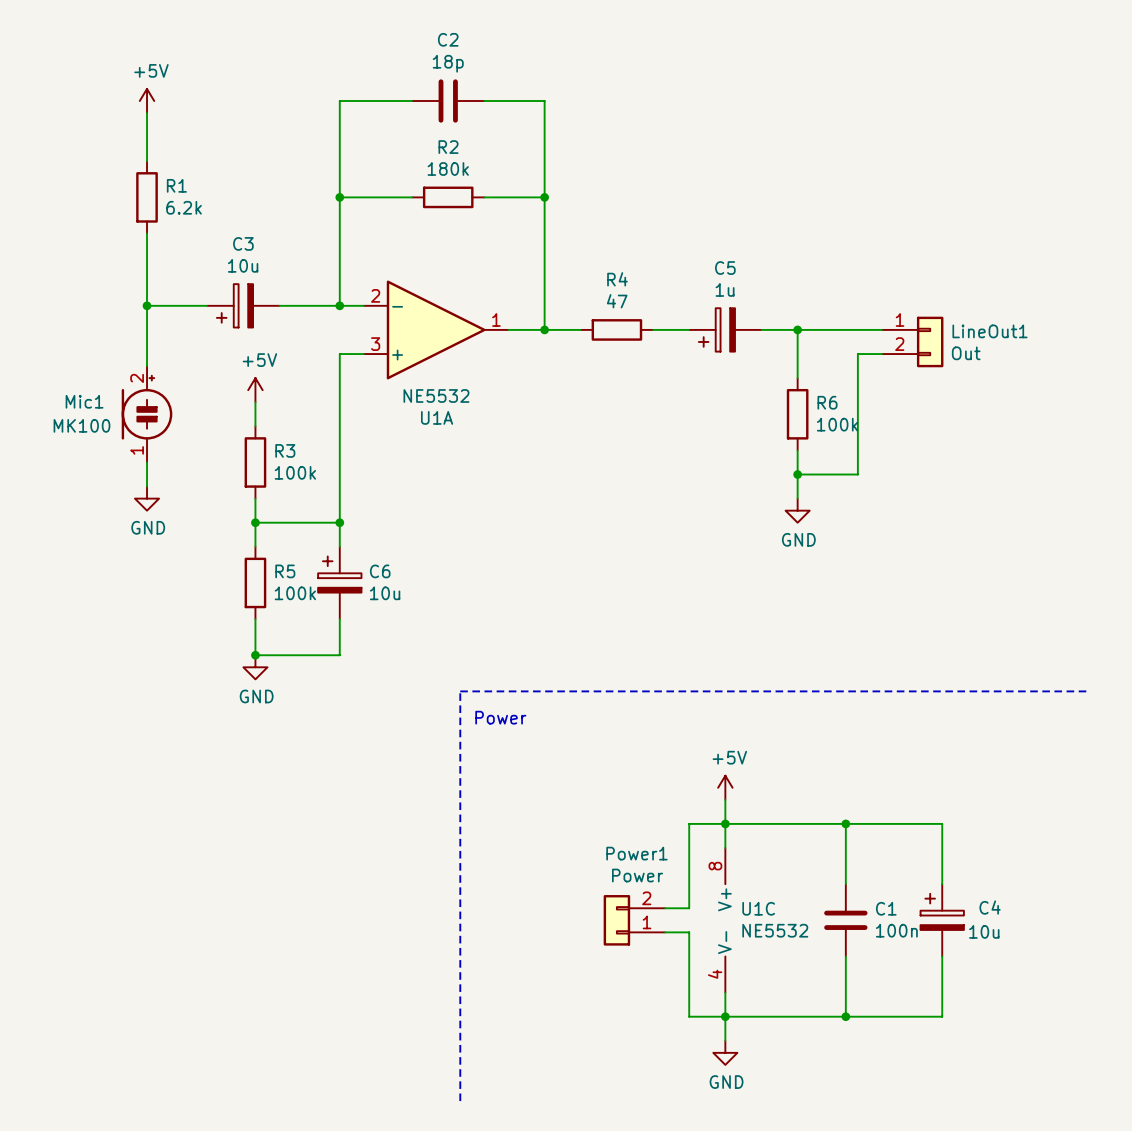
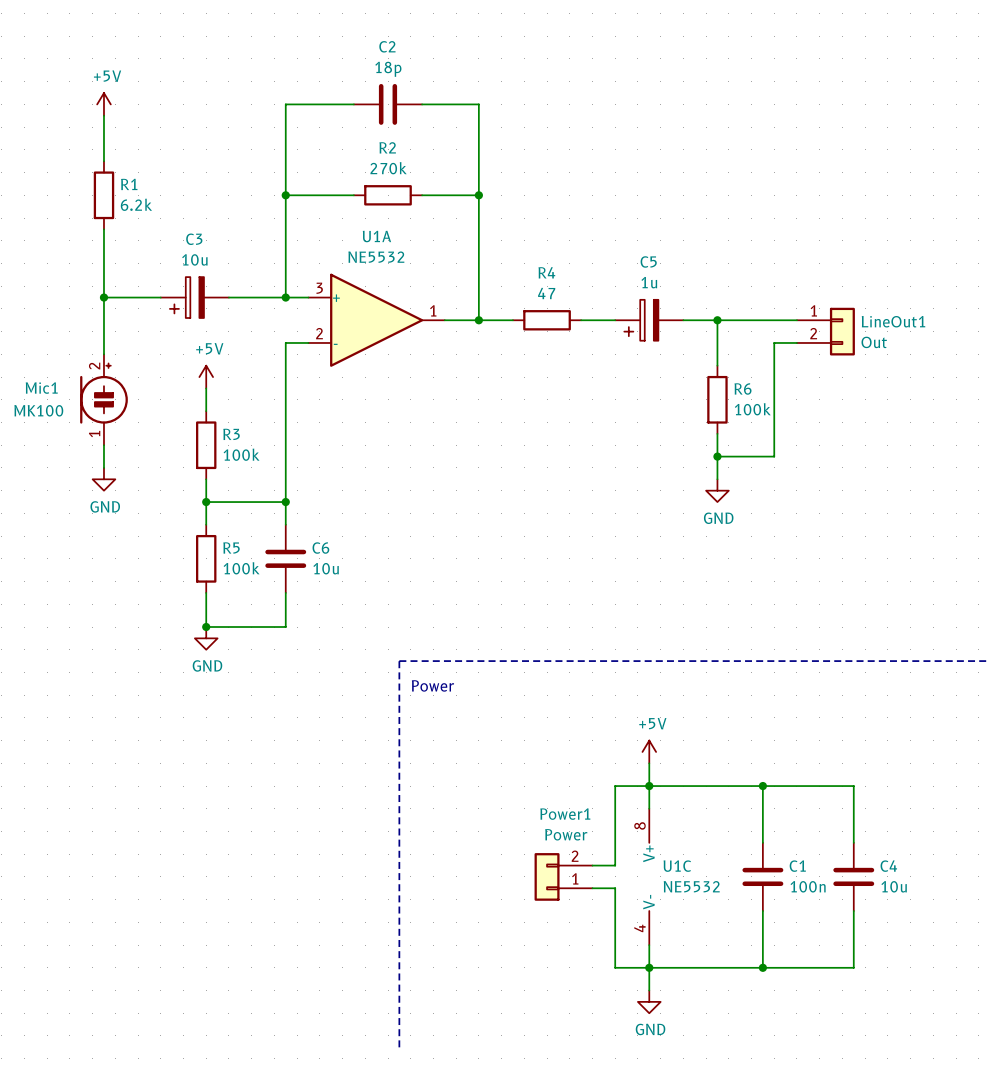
R2 value: 180k (448, 168) -> 270k (388, 168)
U1A flip: as is (436, 329) -> up-down (376, 320)
C6 symbol: [318, 546, 362, 620] -> [265, 524, 307, 593]
C4 symbol: [920, 884, 964, 957] -> [833, 842, 875, 912]

